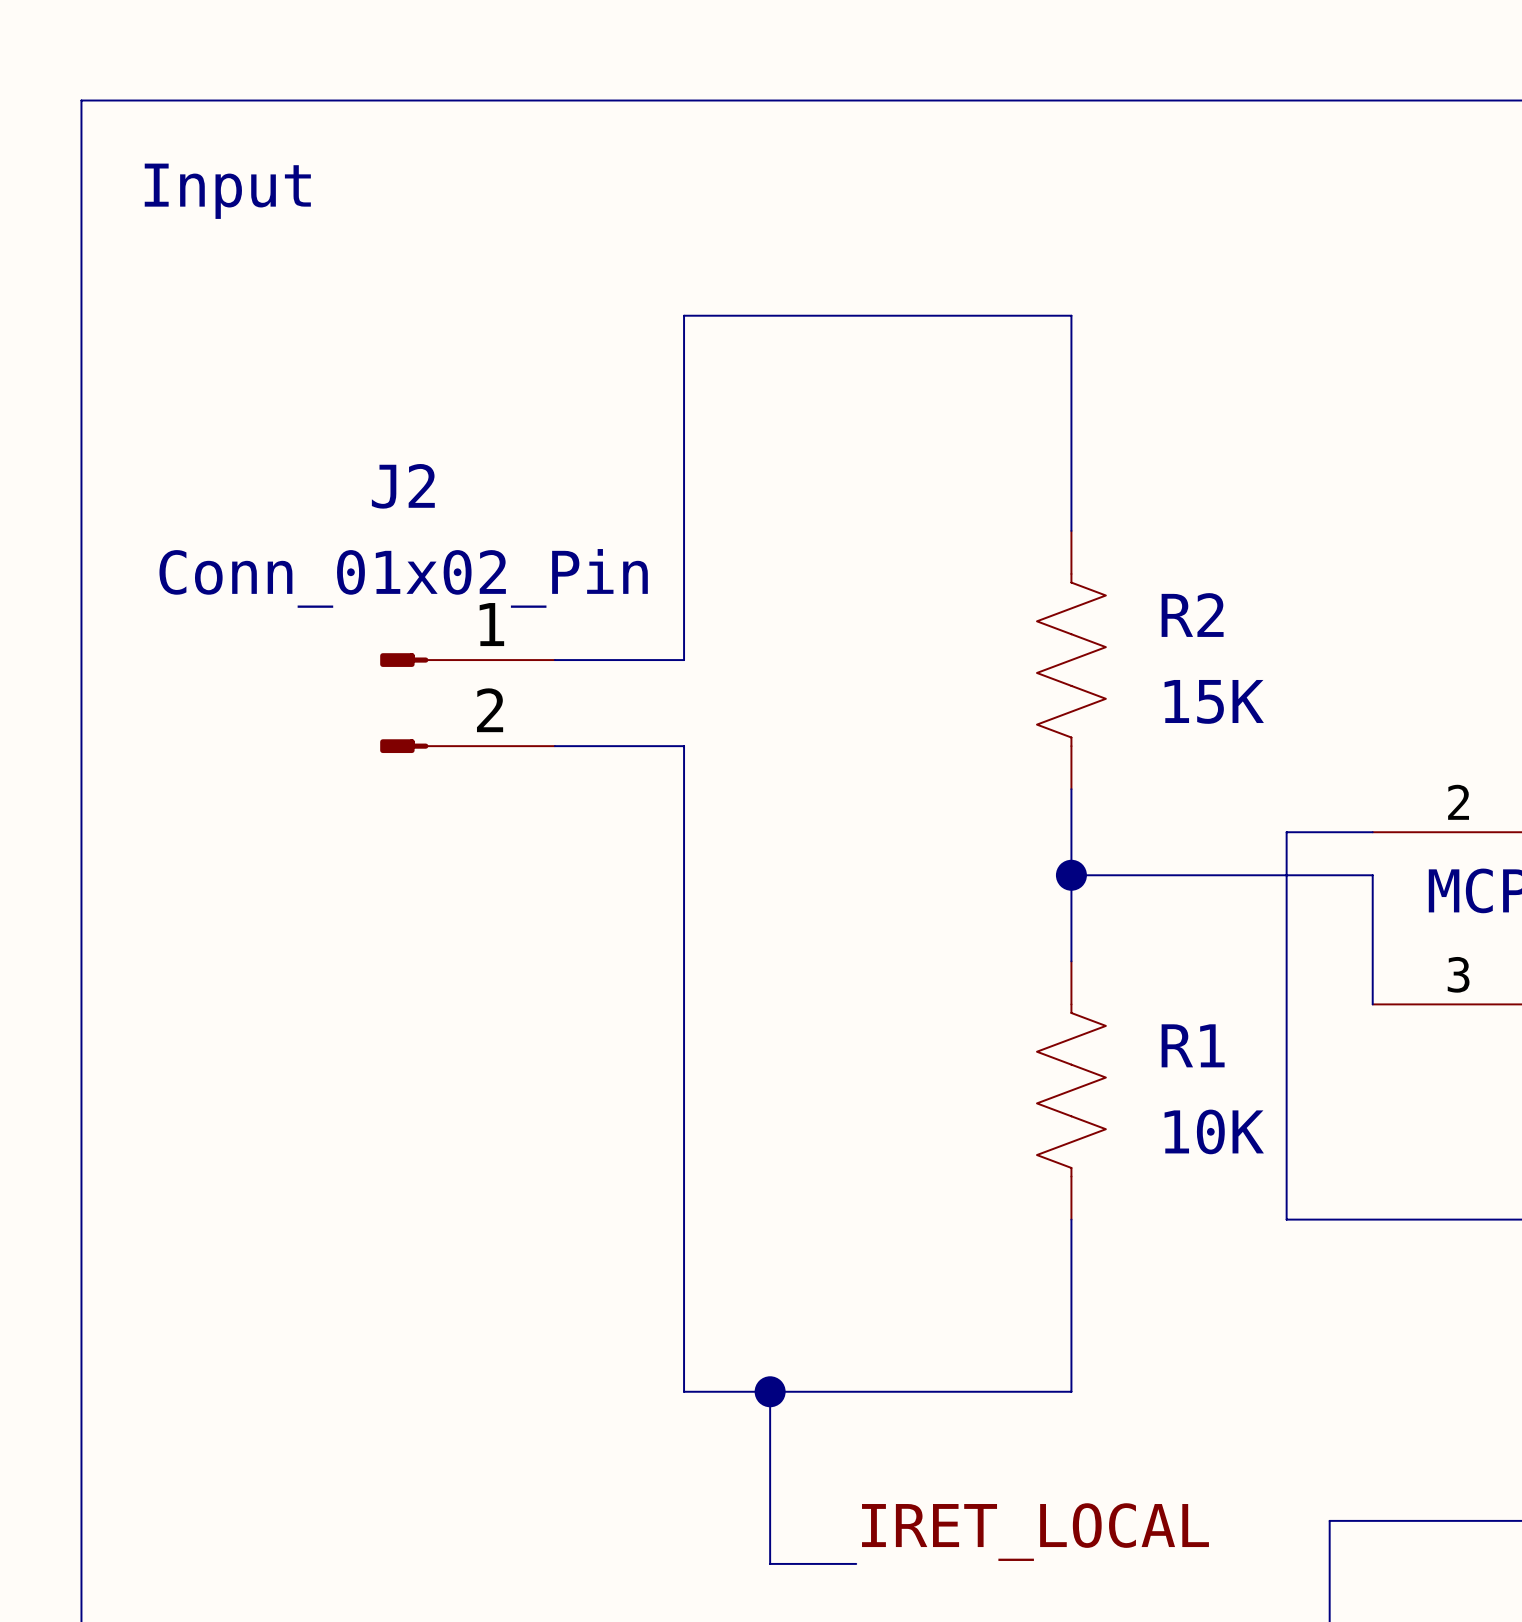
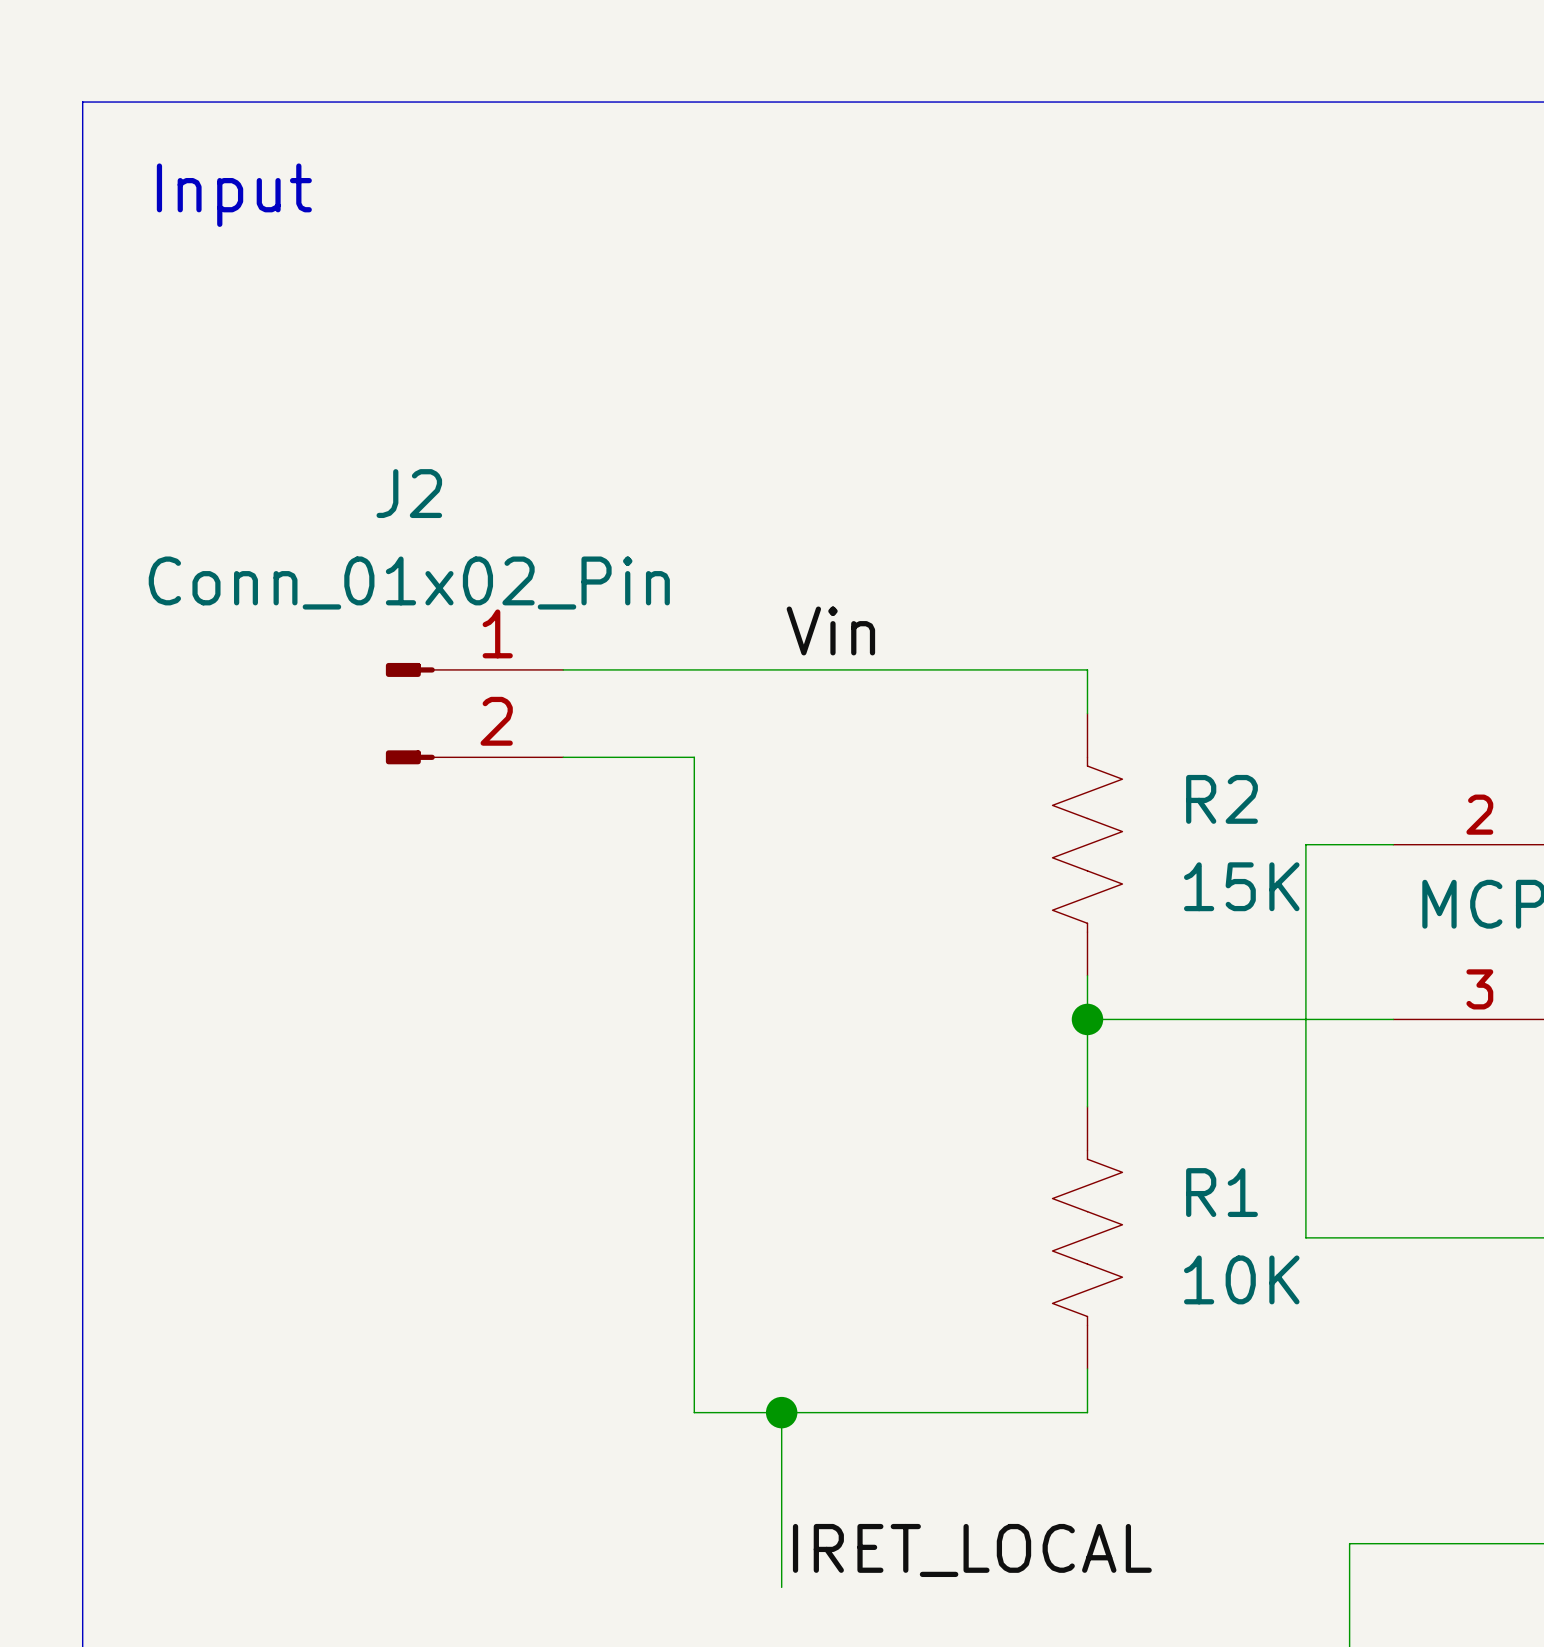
wire: (1071, 530) (1071, 315) (684, 315) (684, 660) -> (1087, 713) (1087, 669) (694, 669)
label: none -> Vin (830, 630)
R2 position: (1071, 660) -> (1087, 844)
wire: (1071, 789) (1071, 961) -> (1087, 1106) (1087, 975)
wire: (1071, 875) (1372, 875) (1372, 1004) -> (1087, 1019) (1393, 1019)
junction position: (1071, 875) -> (1087, 1019)
R1 position: (1071, 1090) -> (1087, 1237)
wire: (1071, 1219) (1071, 1348) -> none
label position: IRET_LOCAL (1035, 1532) -> IRET_LOCAL (972, 1550)
wire: (770, 1563) (856, 1563) -> none

